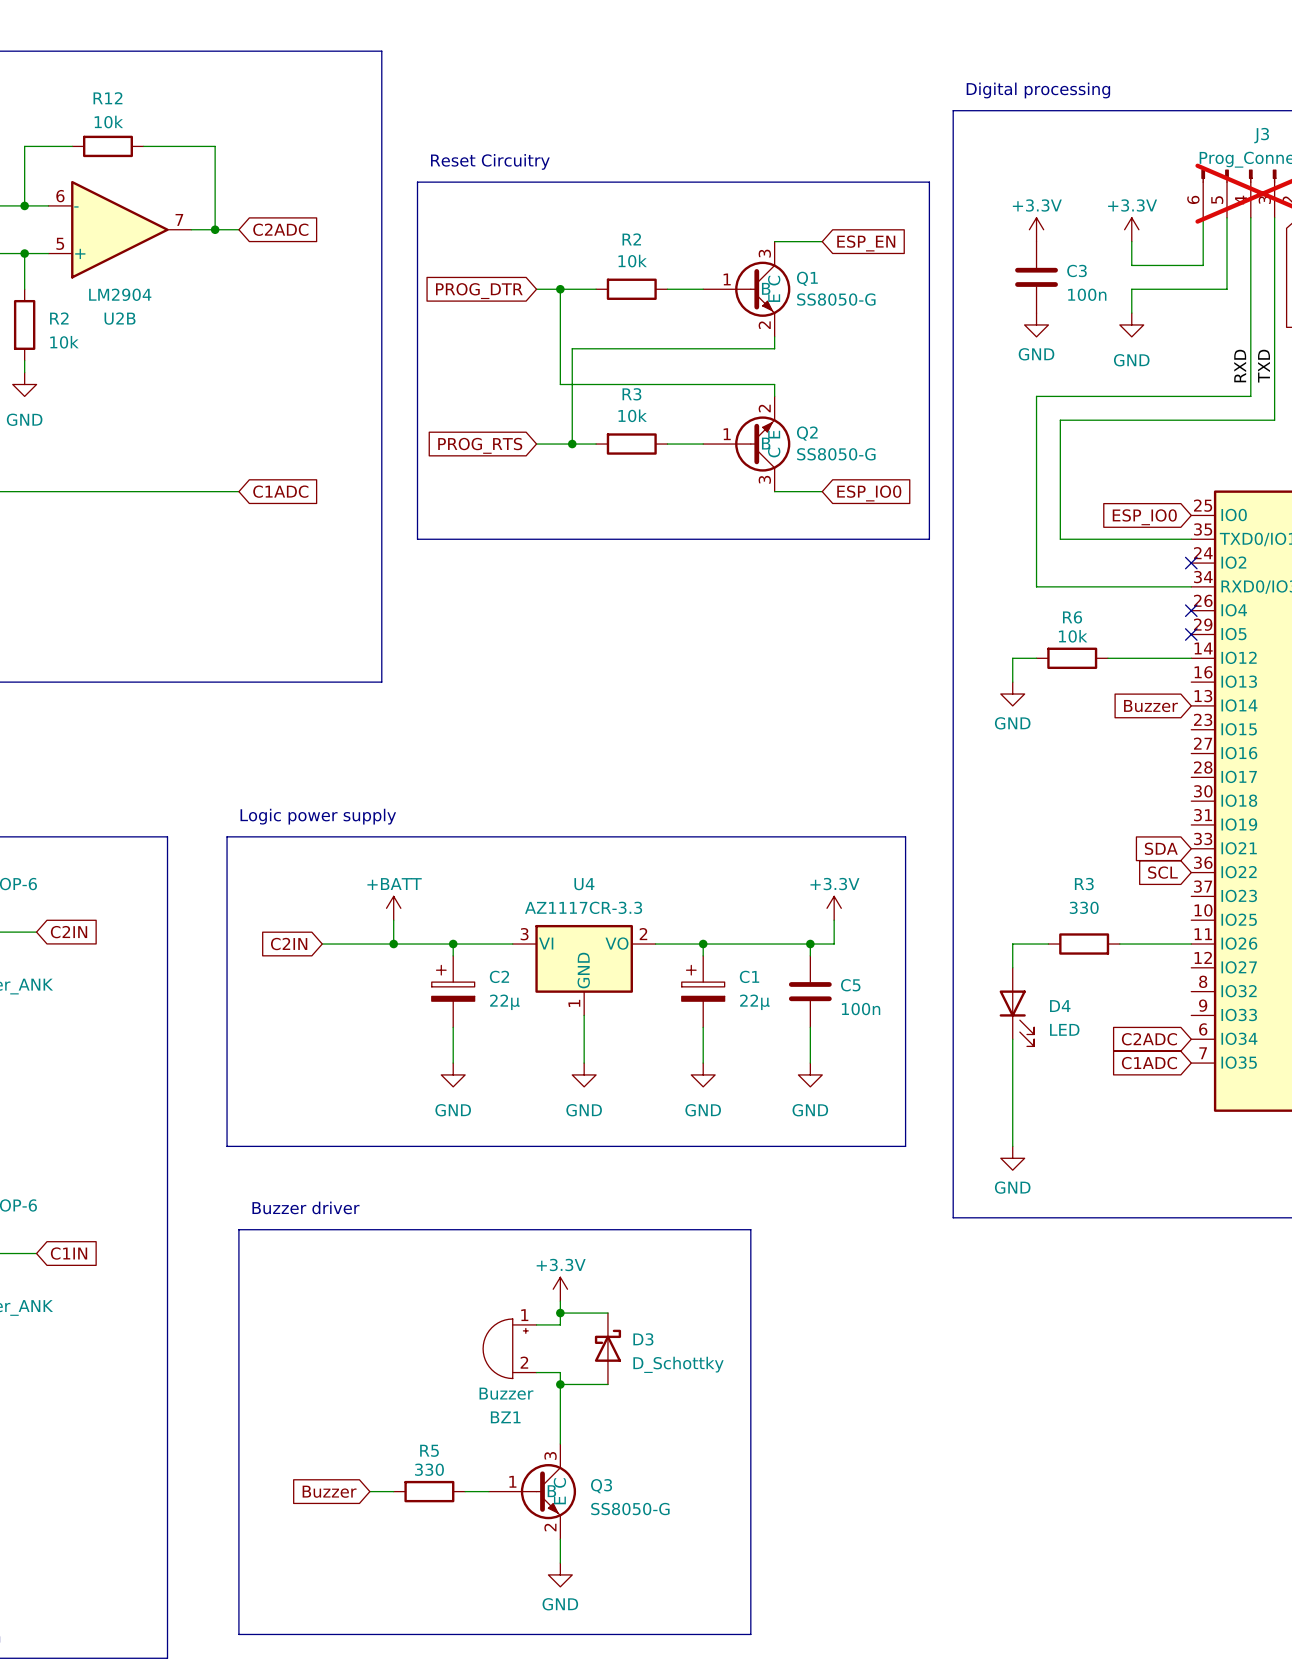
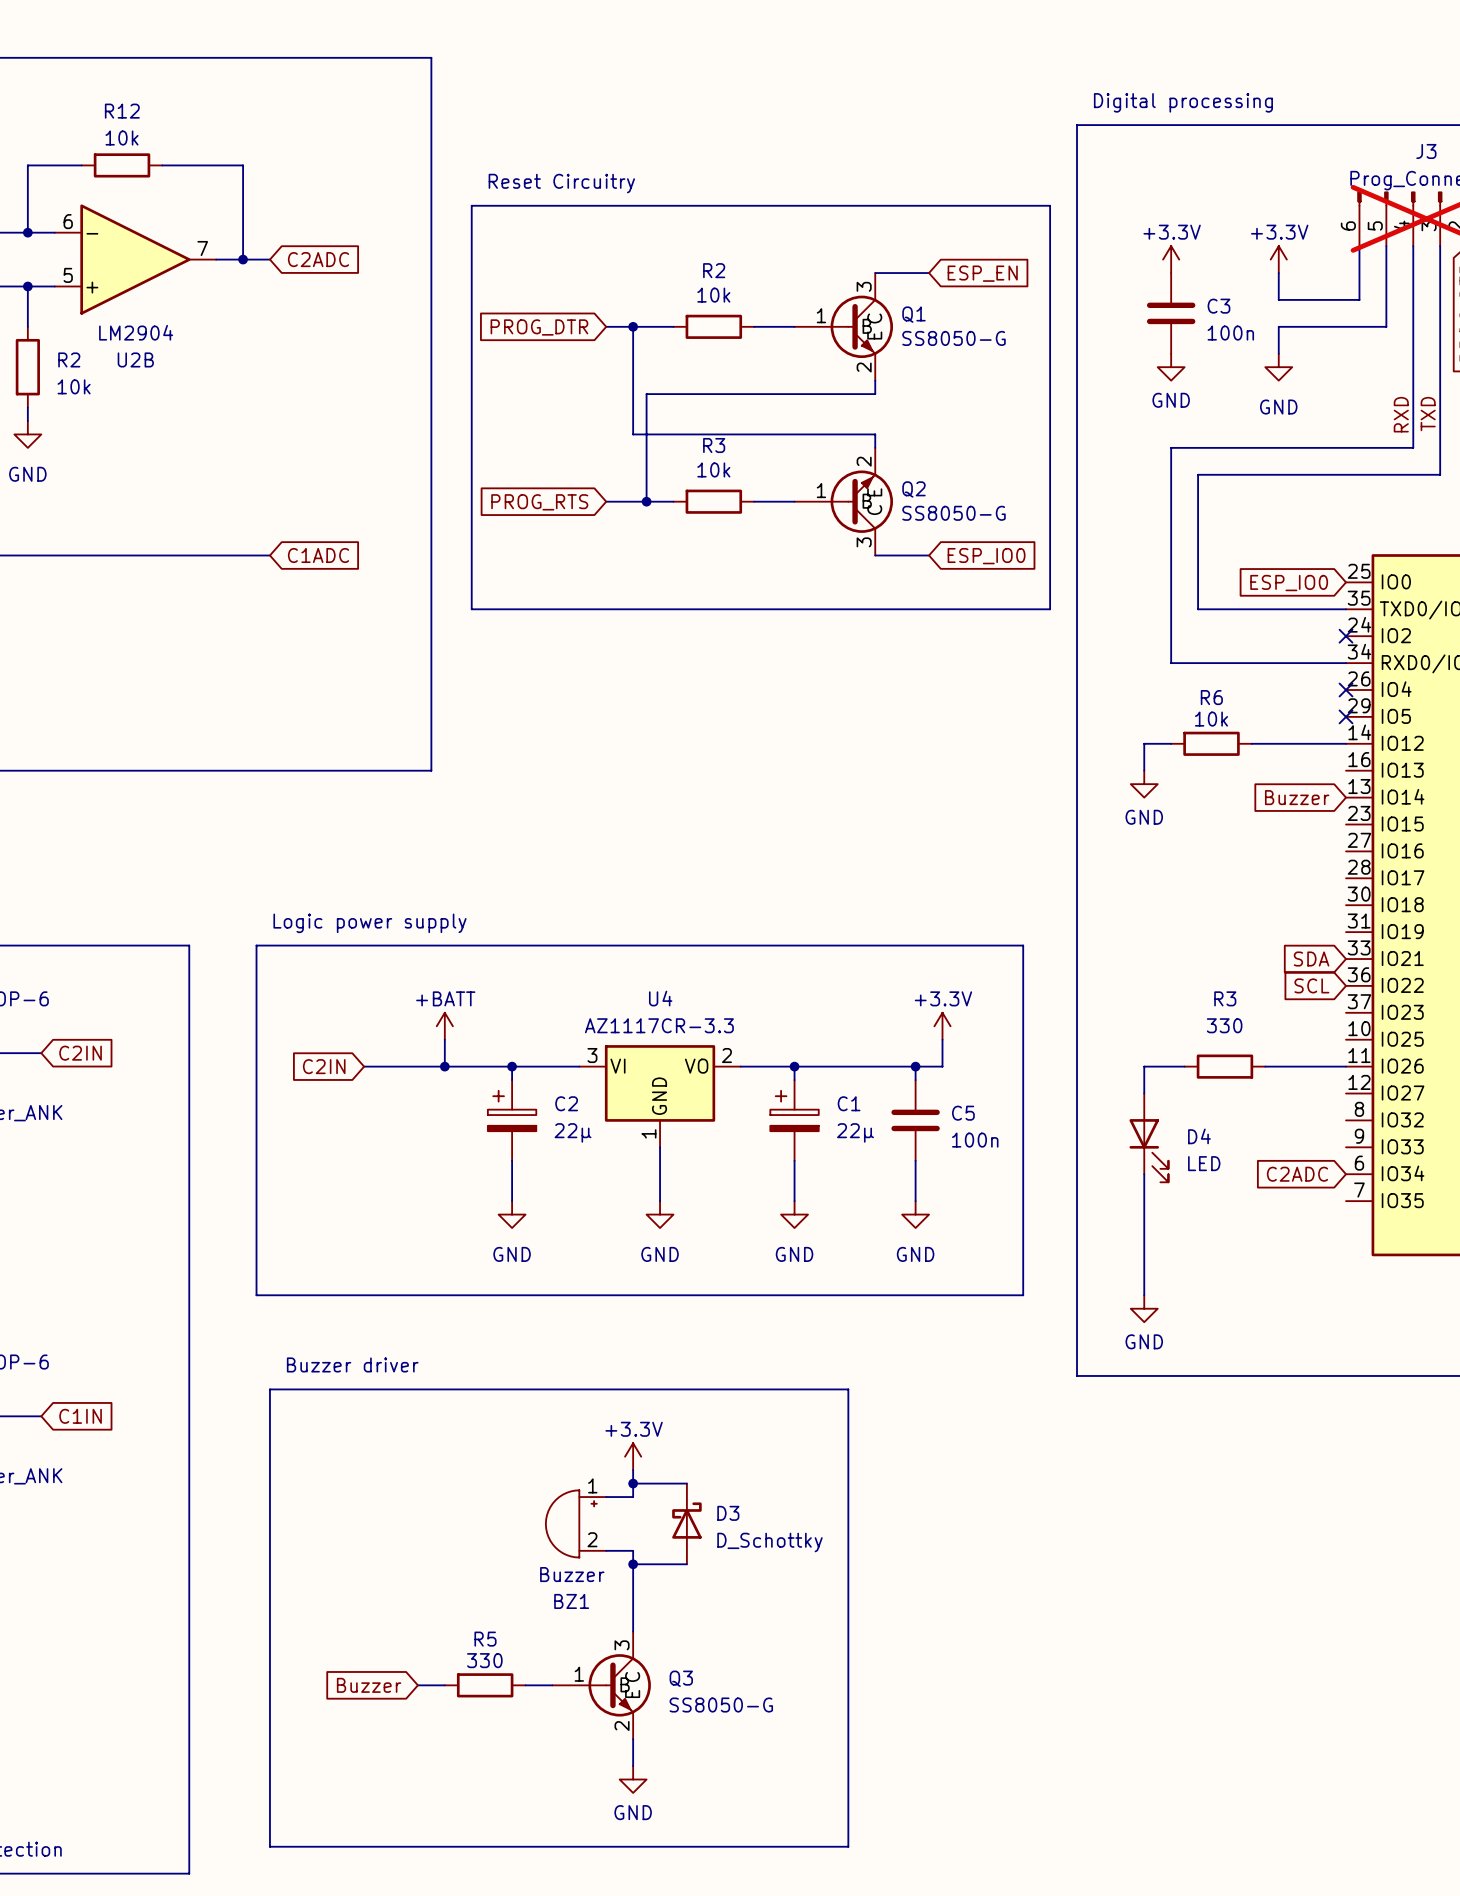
global label: C1ADC (1149, 1063) -> none

